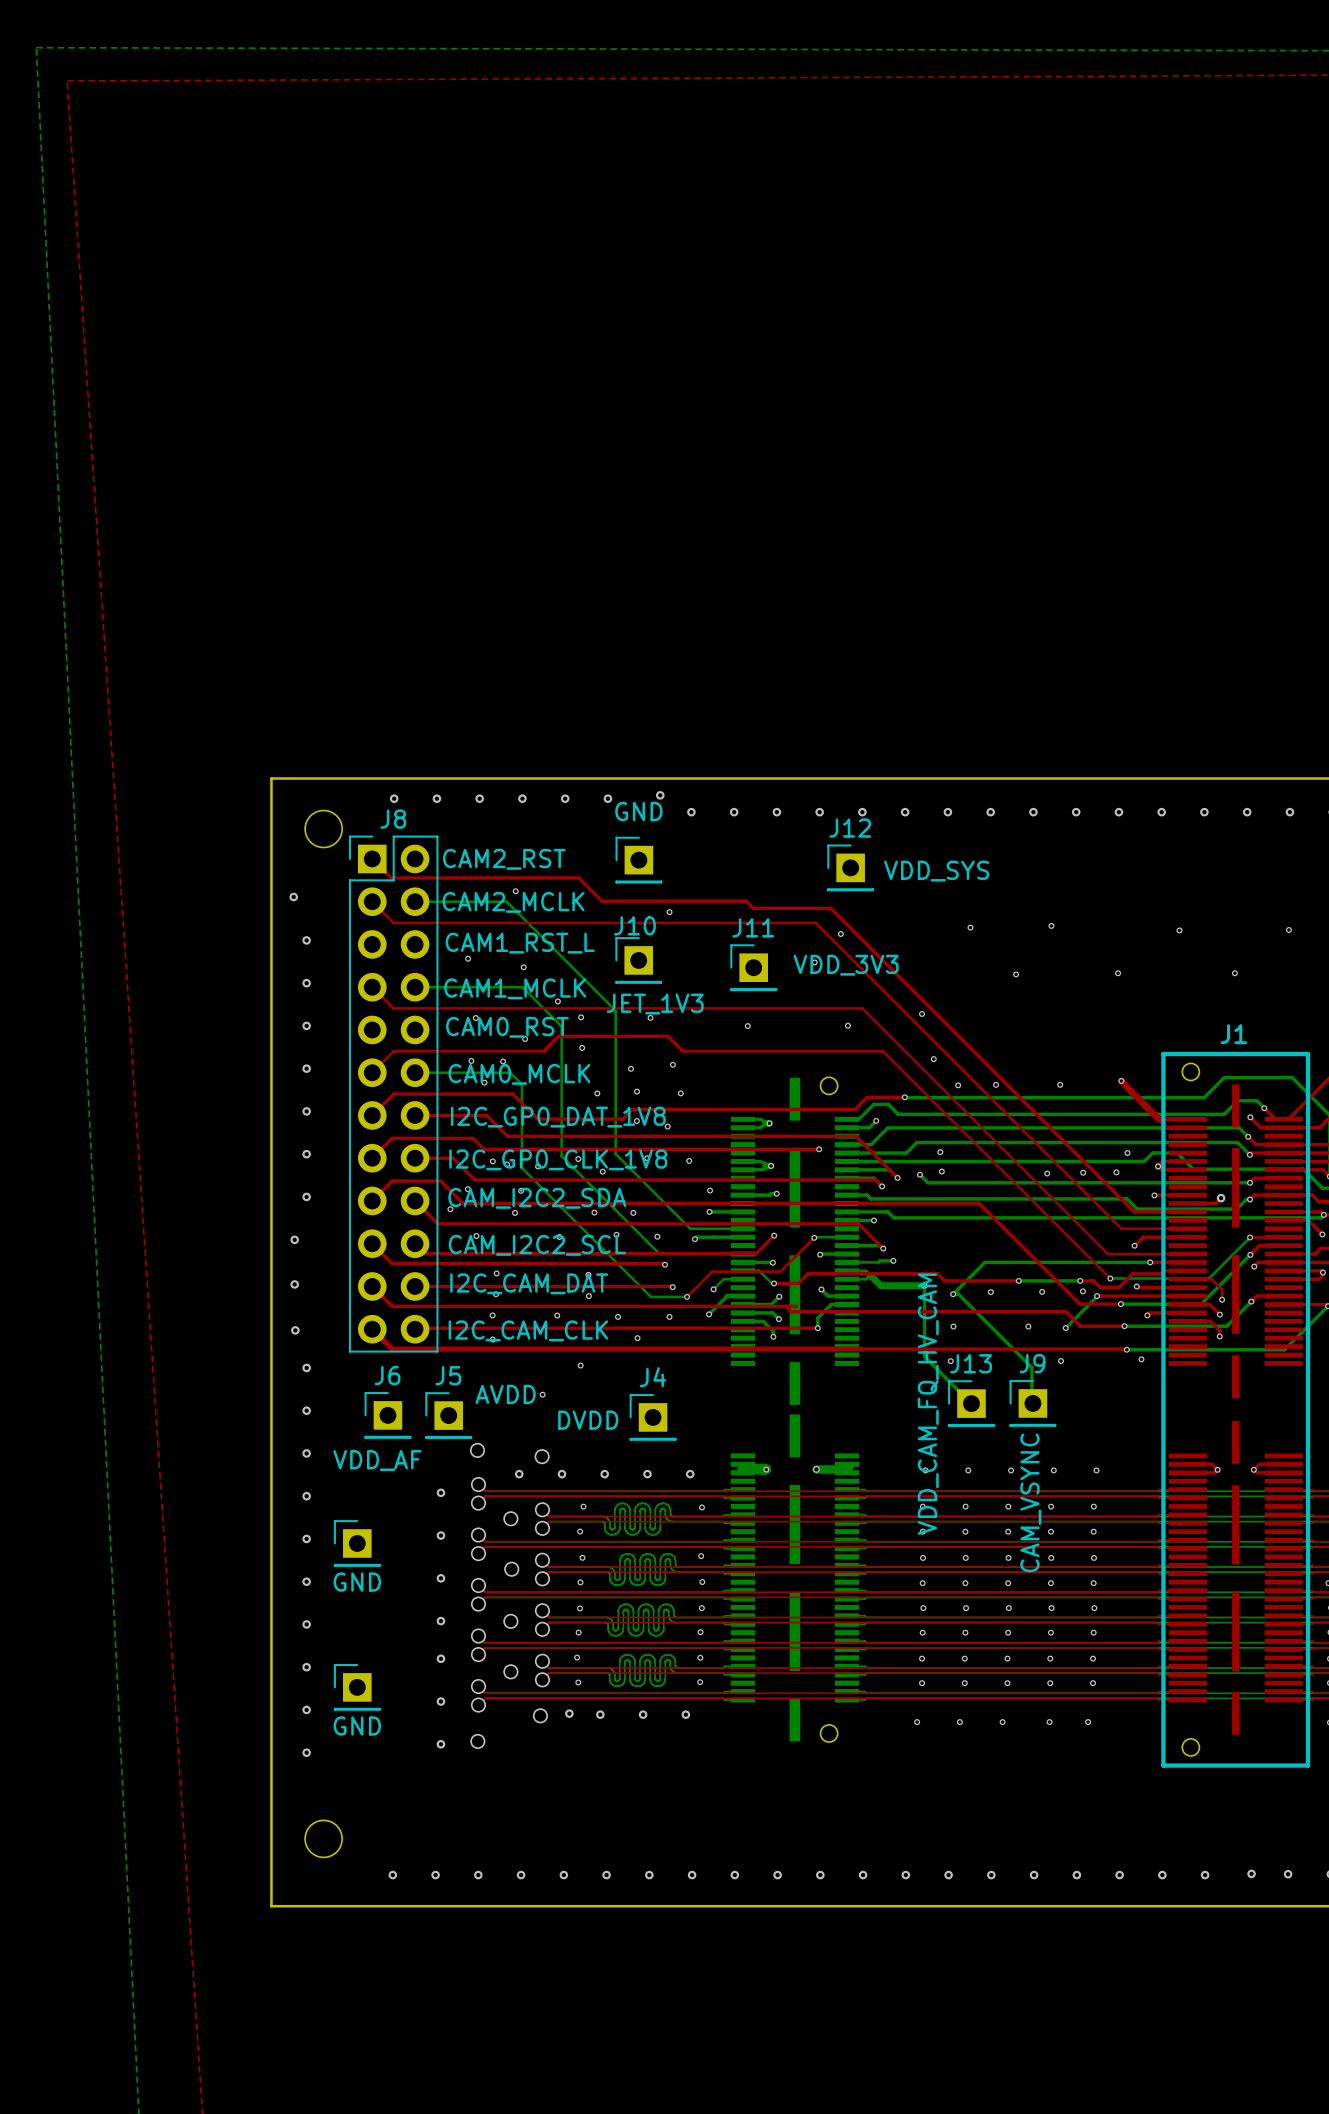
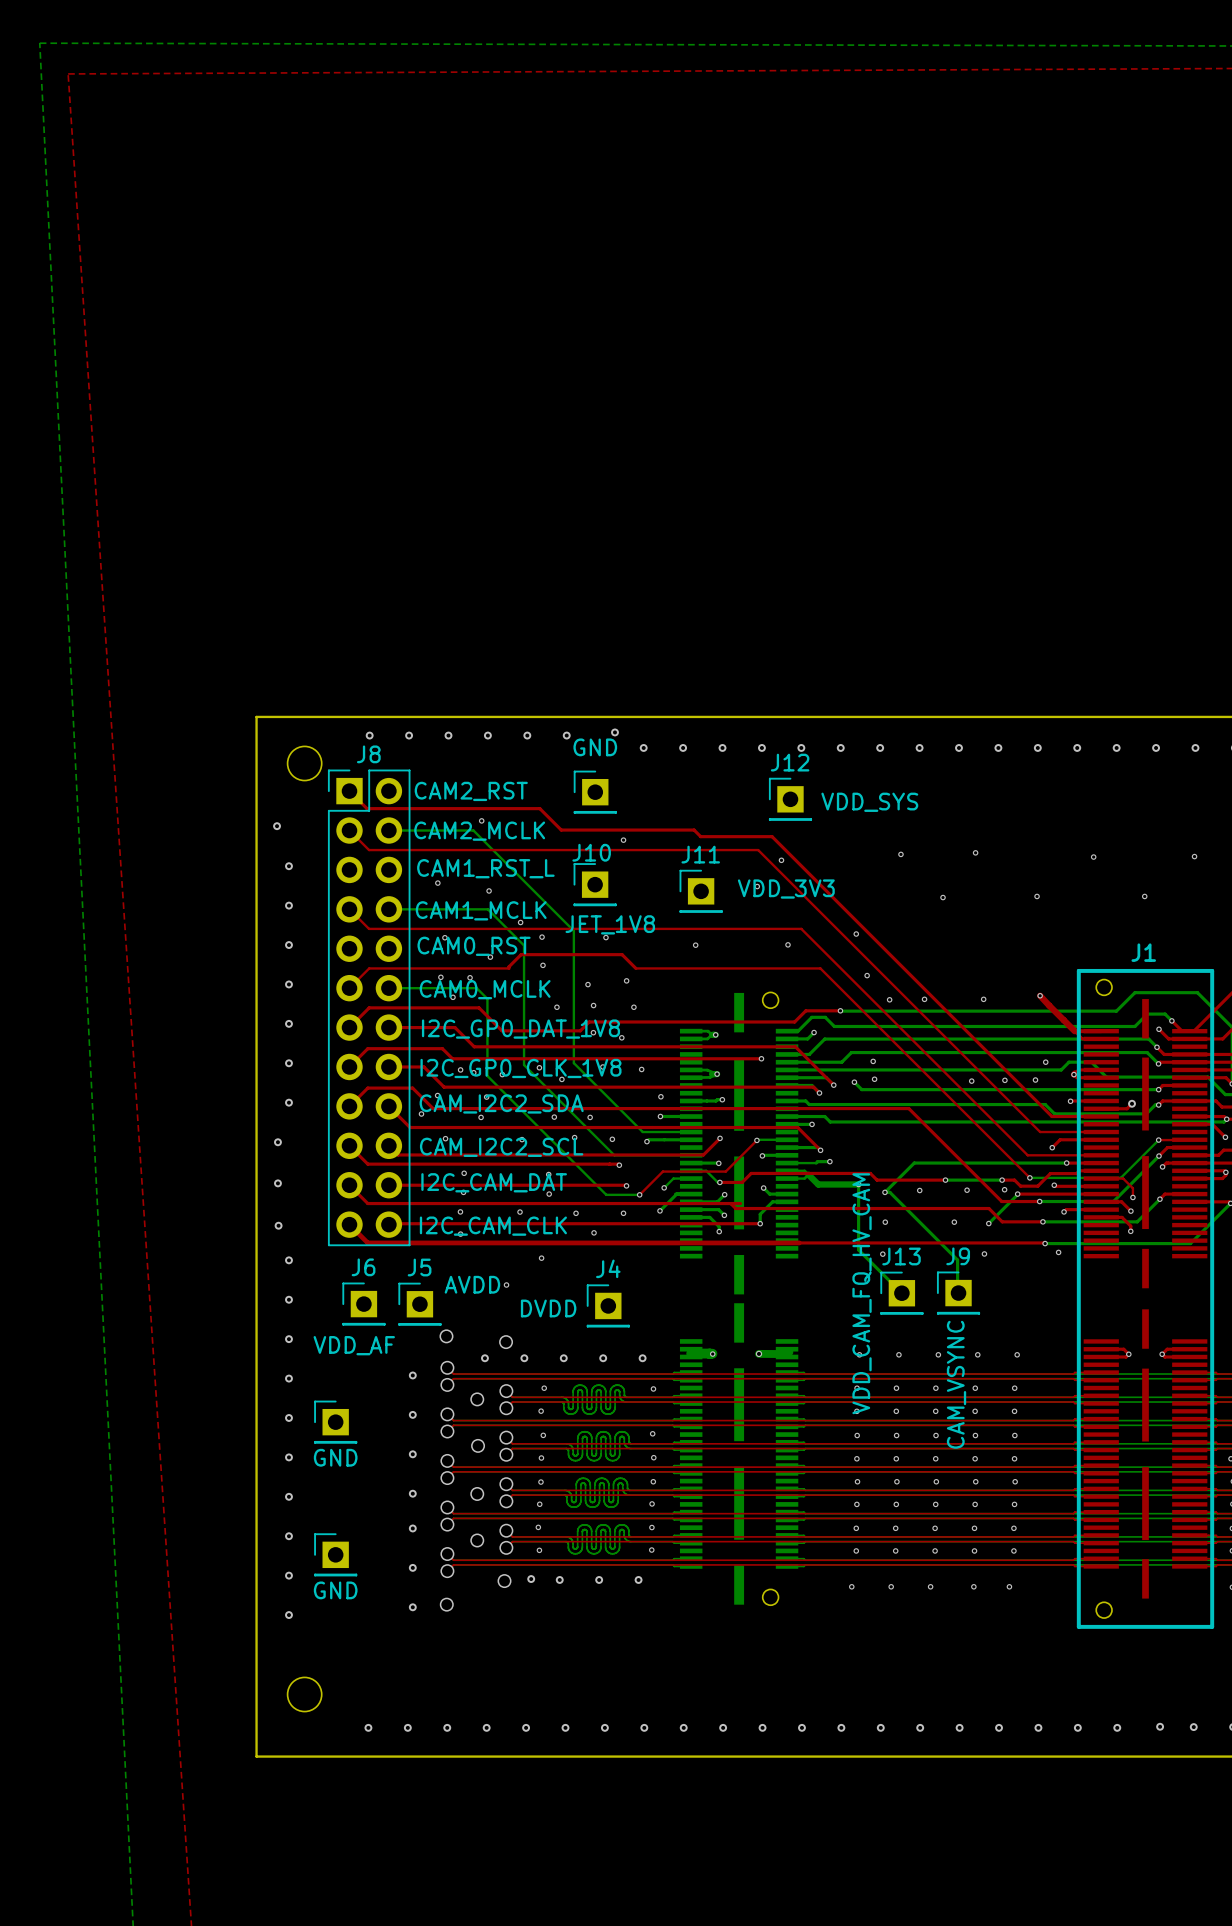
text: JET_1V3 (655, 1004) -> JET_1V8 (610, 924)

